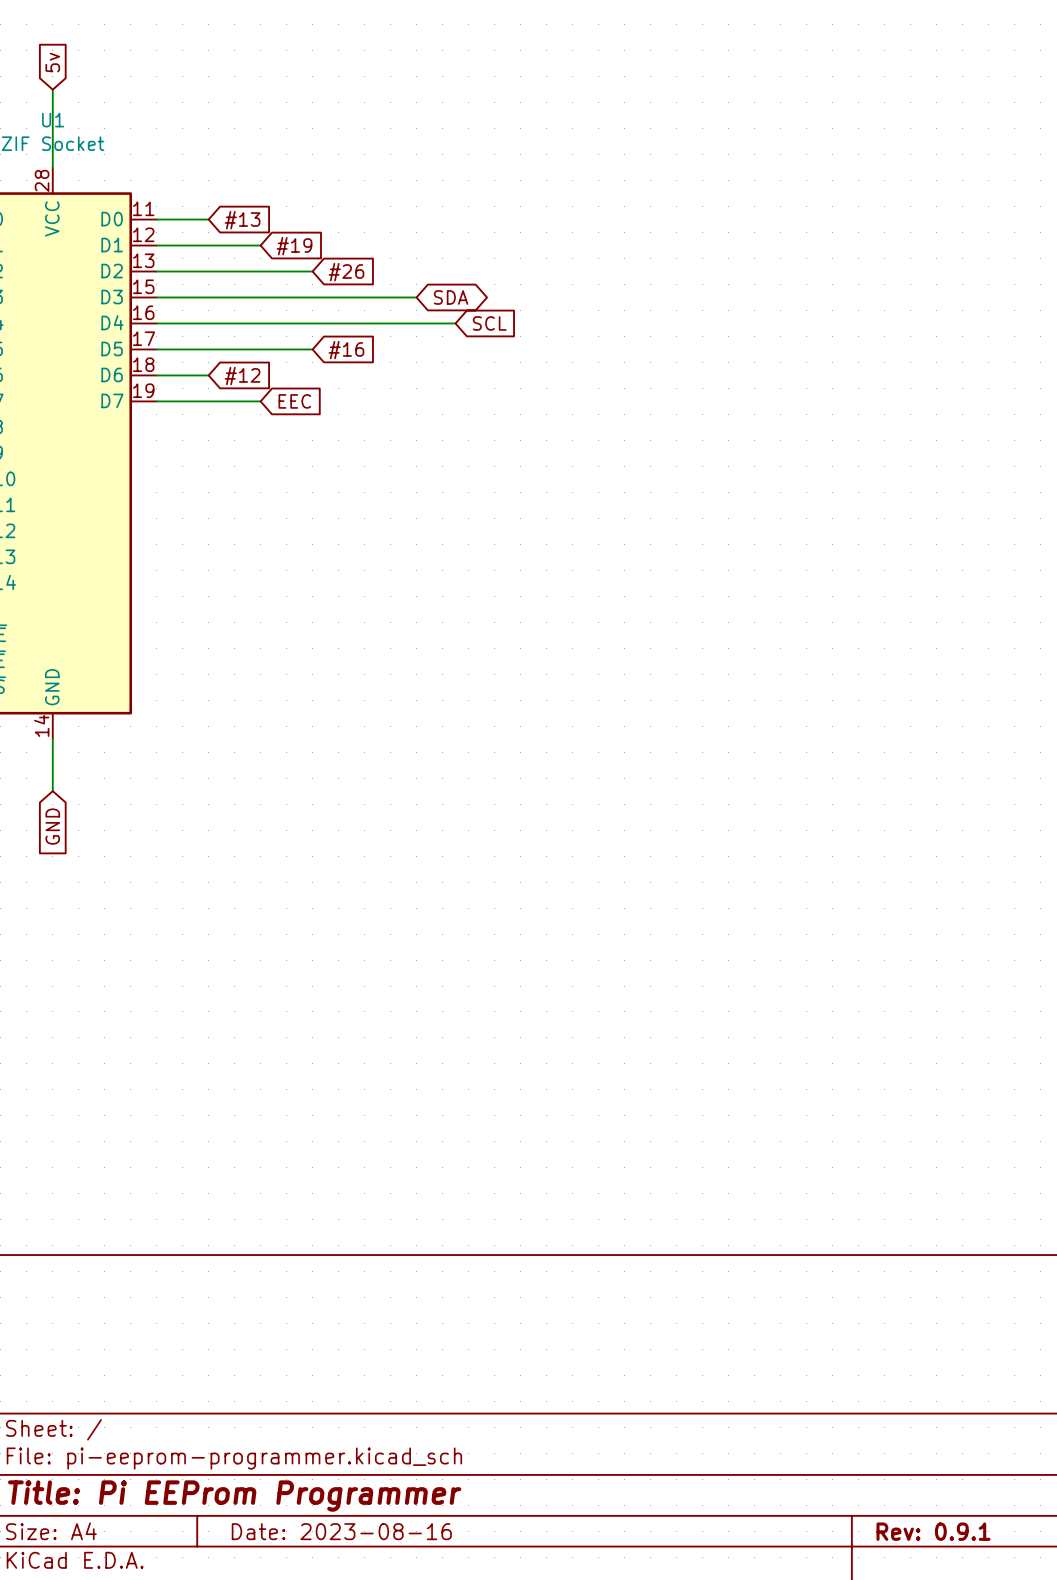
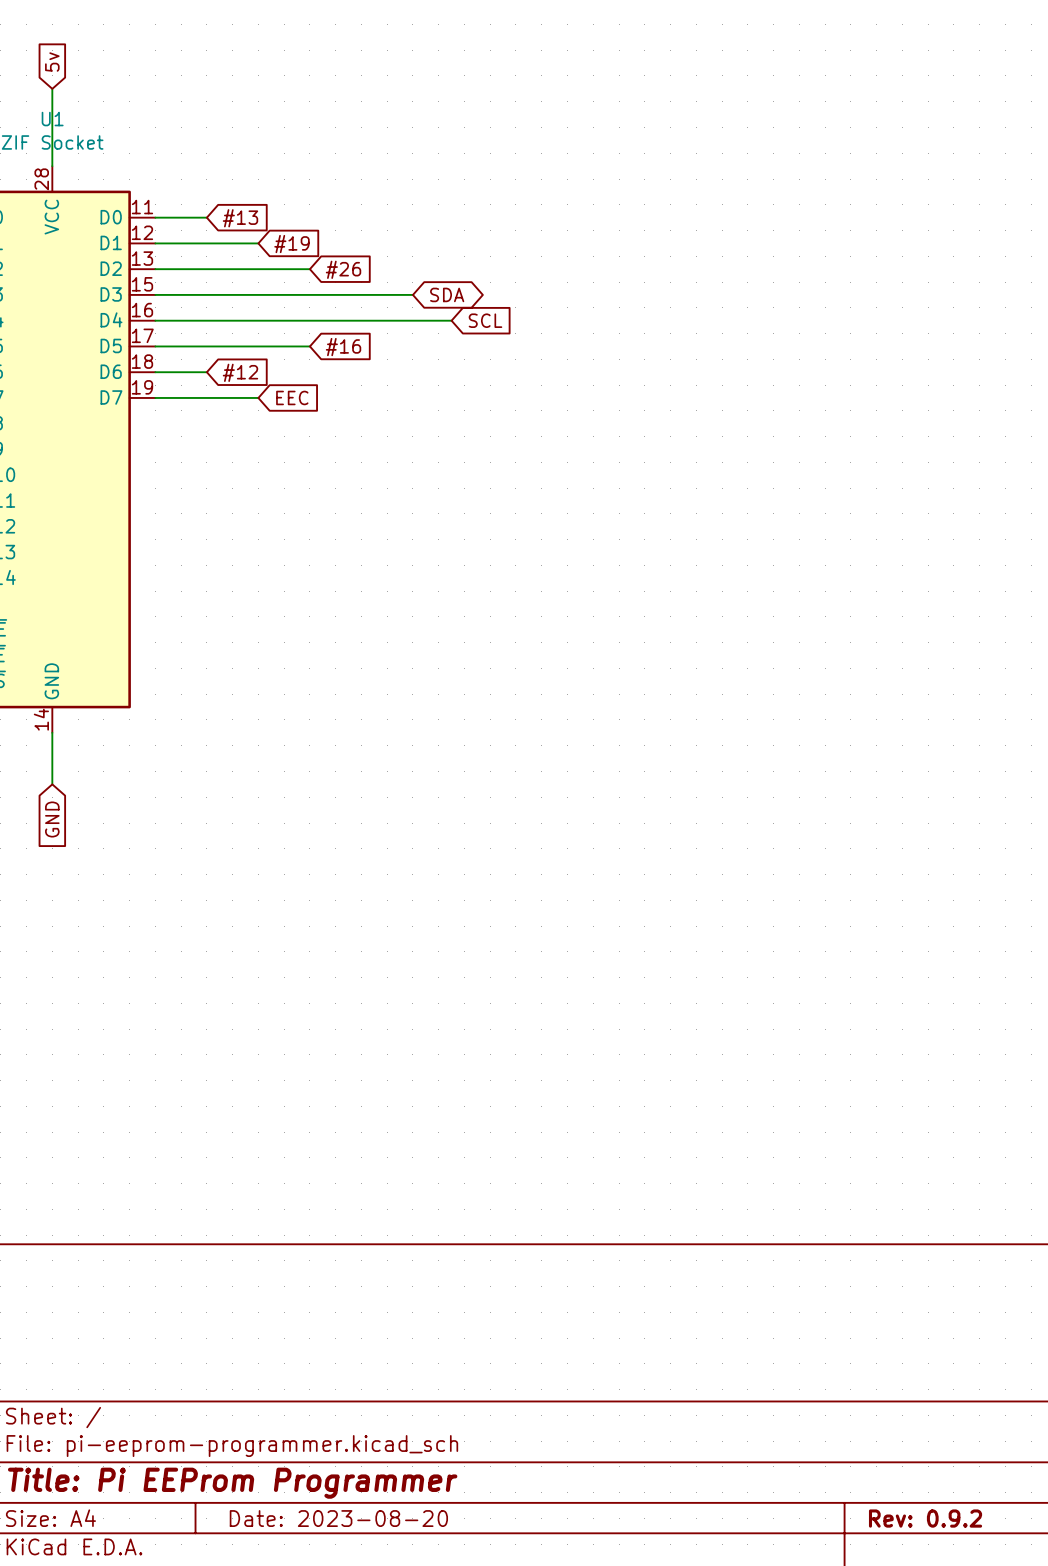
title block: Date: 2023-08-16 (341, 1531) -> Date: 2023-08-20 (338, 1518)
title block: Rev: 0.9.1 (933, 1531) -> Rev: 0.9.2 (925, 1518)

